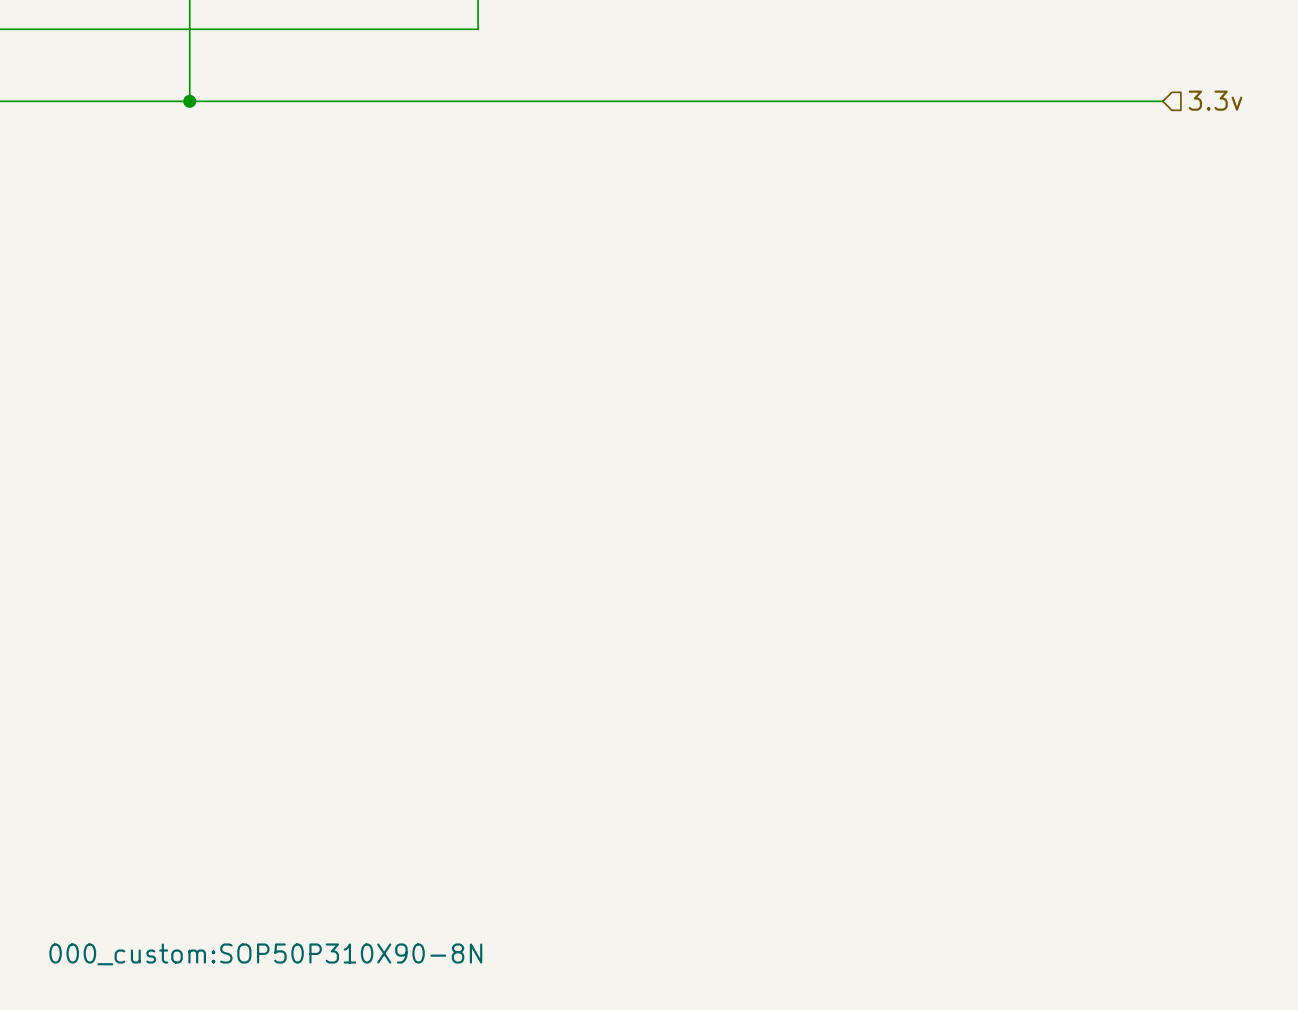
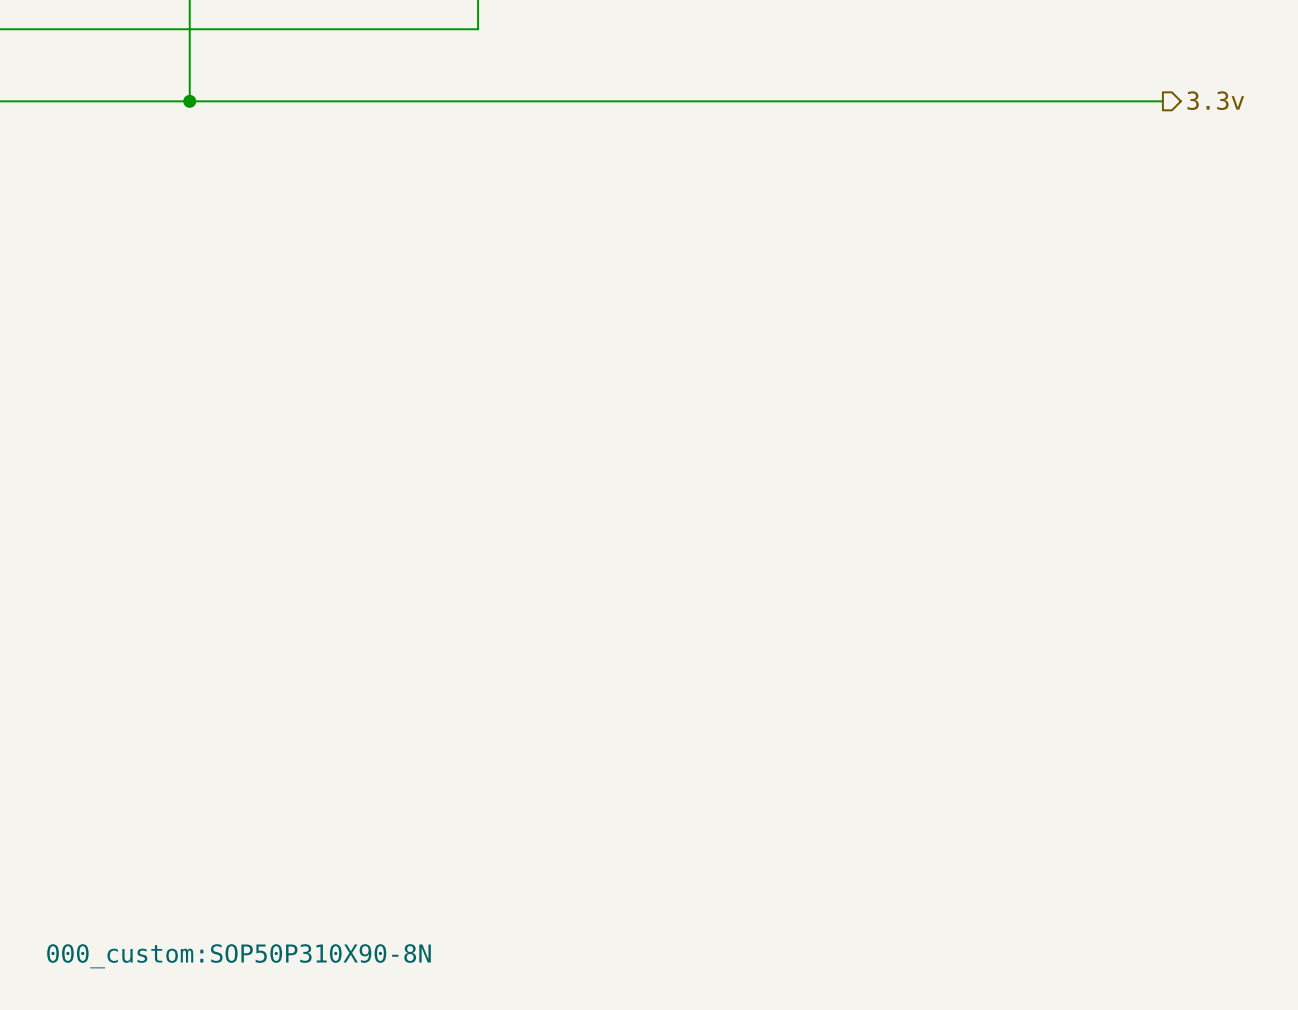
hierarchical label shape: input (1215, 100) -> output (1215, 100)

